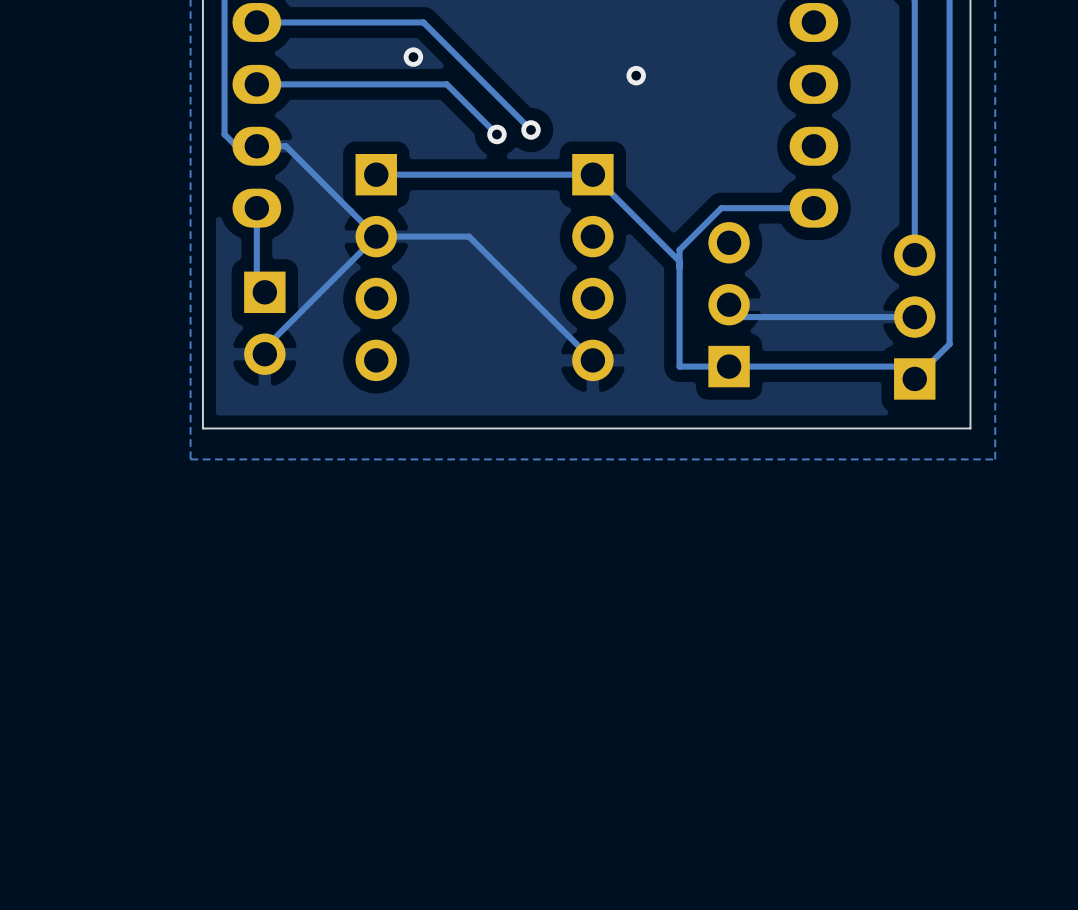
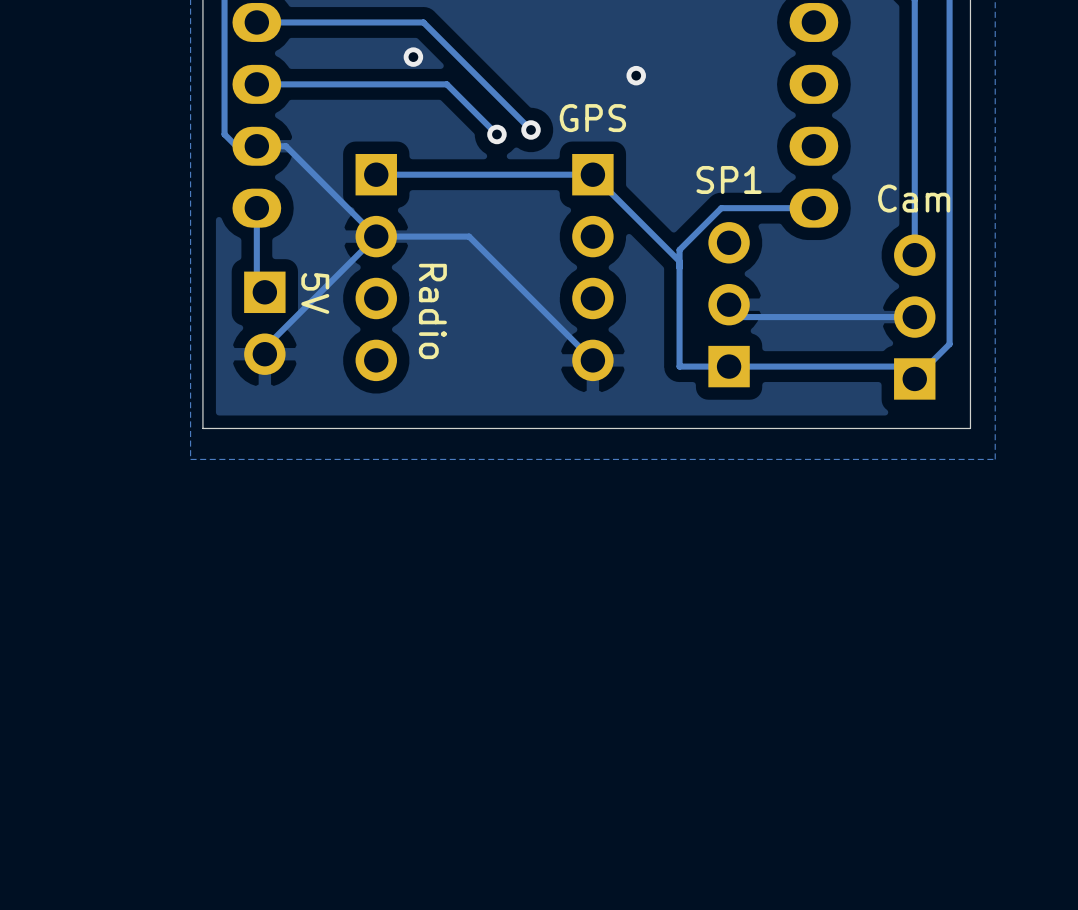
part value: none -> GPS (592, 118)
part value: none -> SP1 (729, 179)
part value: none -> Cam (914, 198)
part value: none -> 5V (315, 293)
part value: none -> Radio (432, 311)

